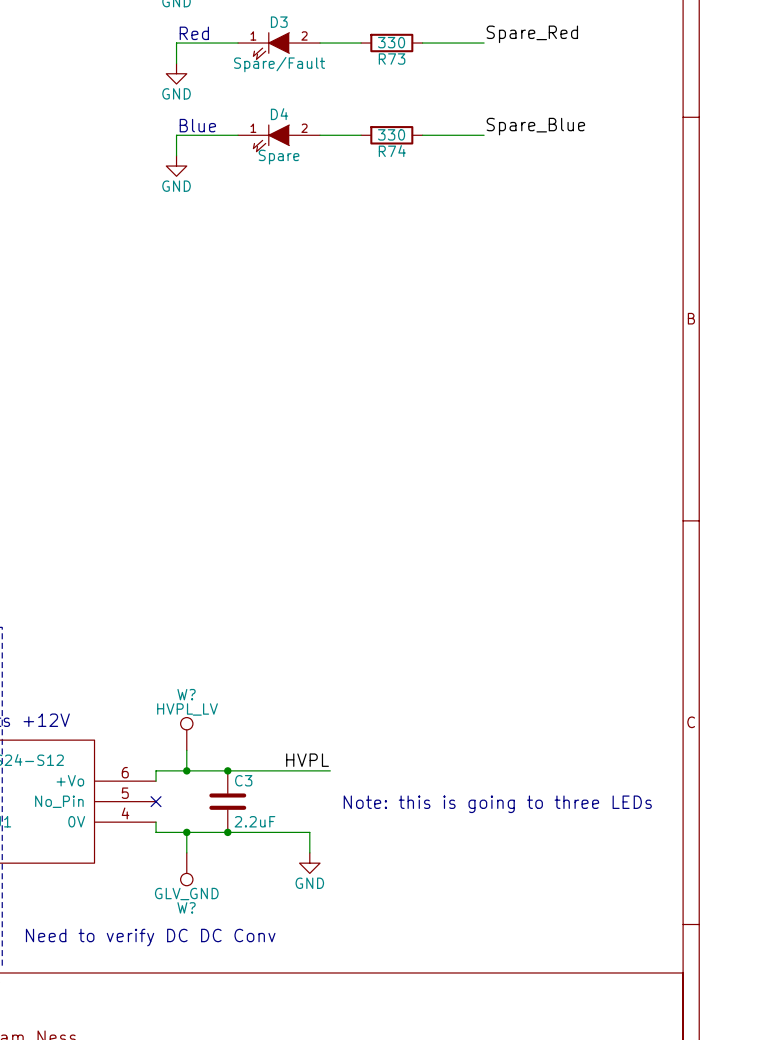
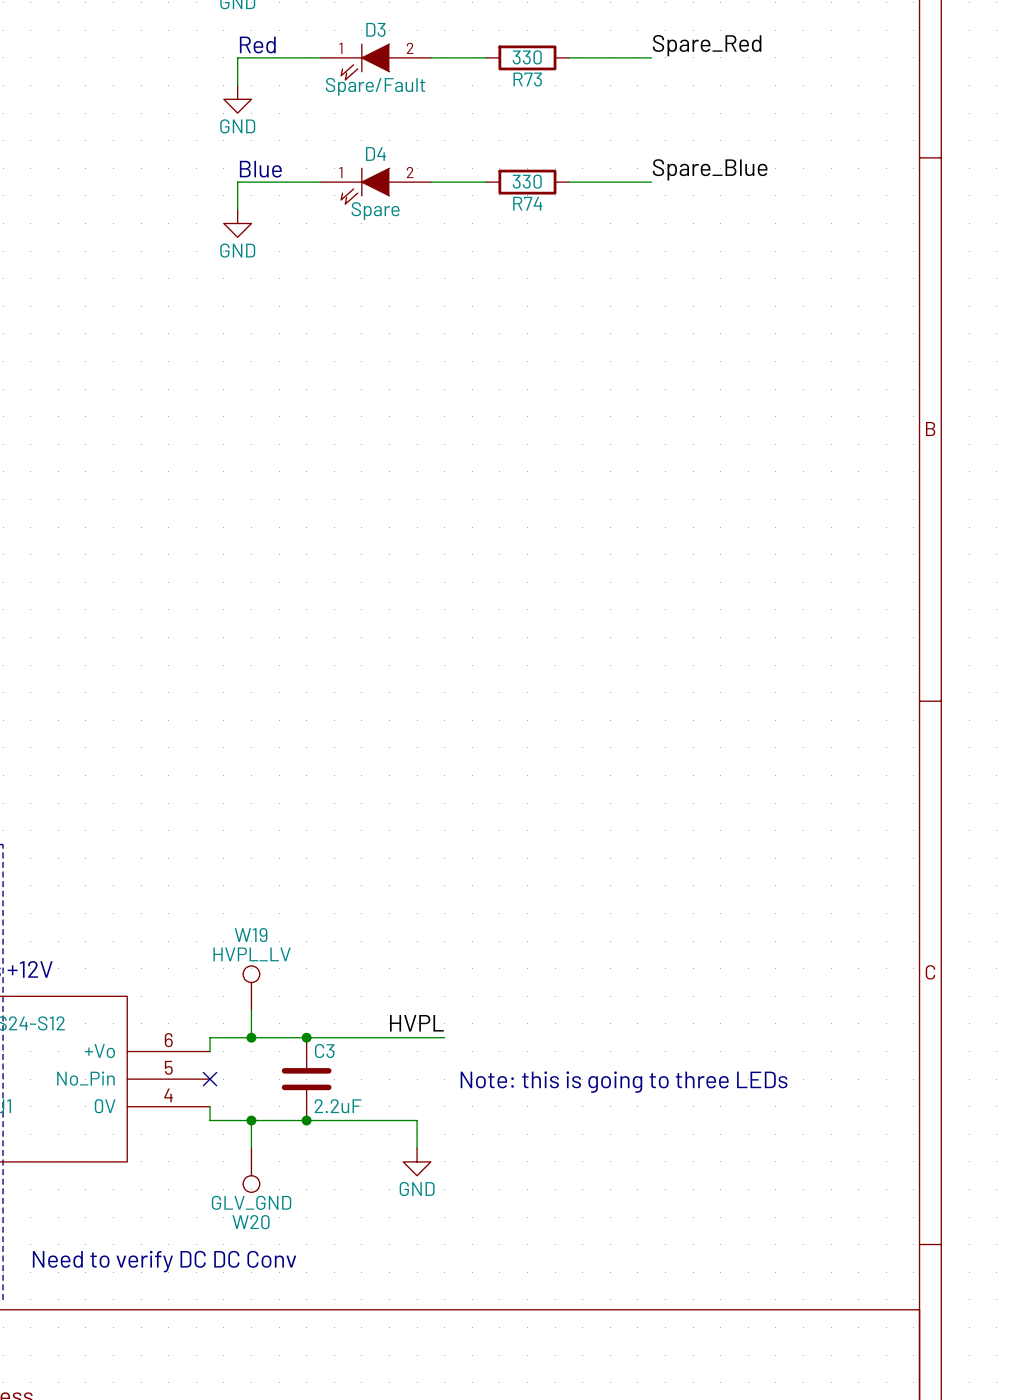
W? name: W? (186, 694) -> W19 (251, 935)
W? name: W? (186, 907) -> W20 (251, 1222)

